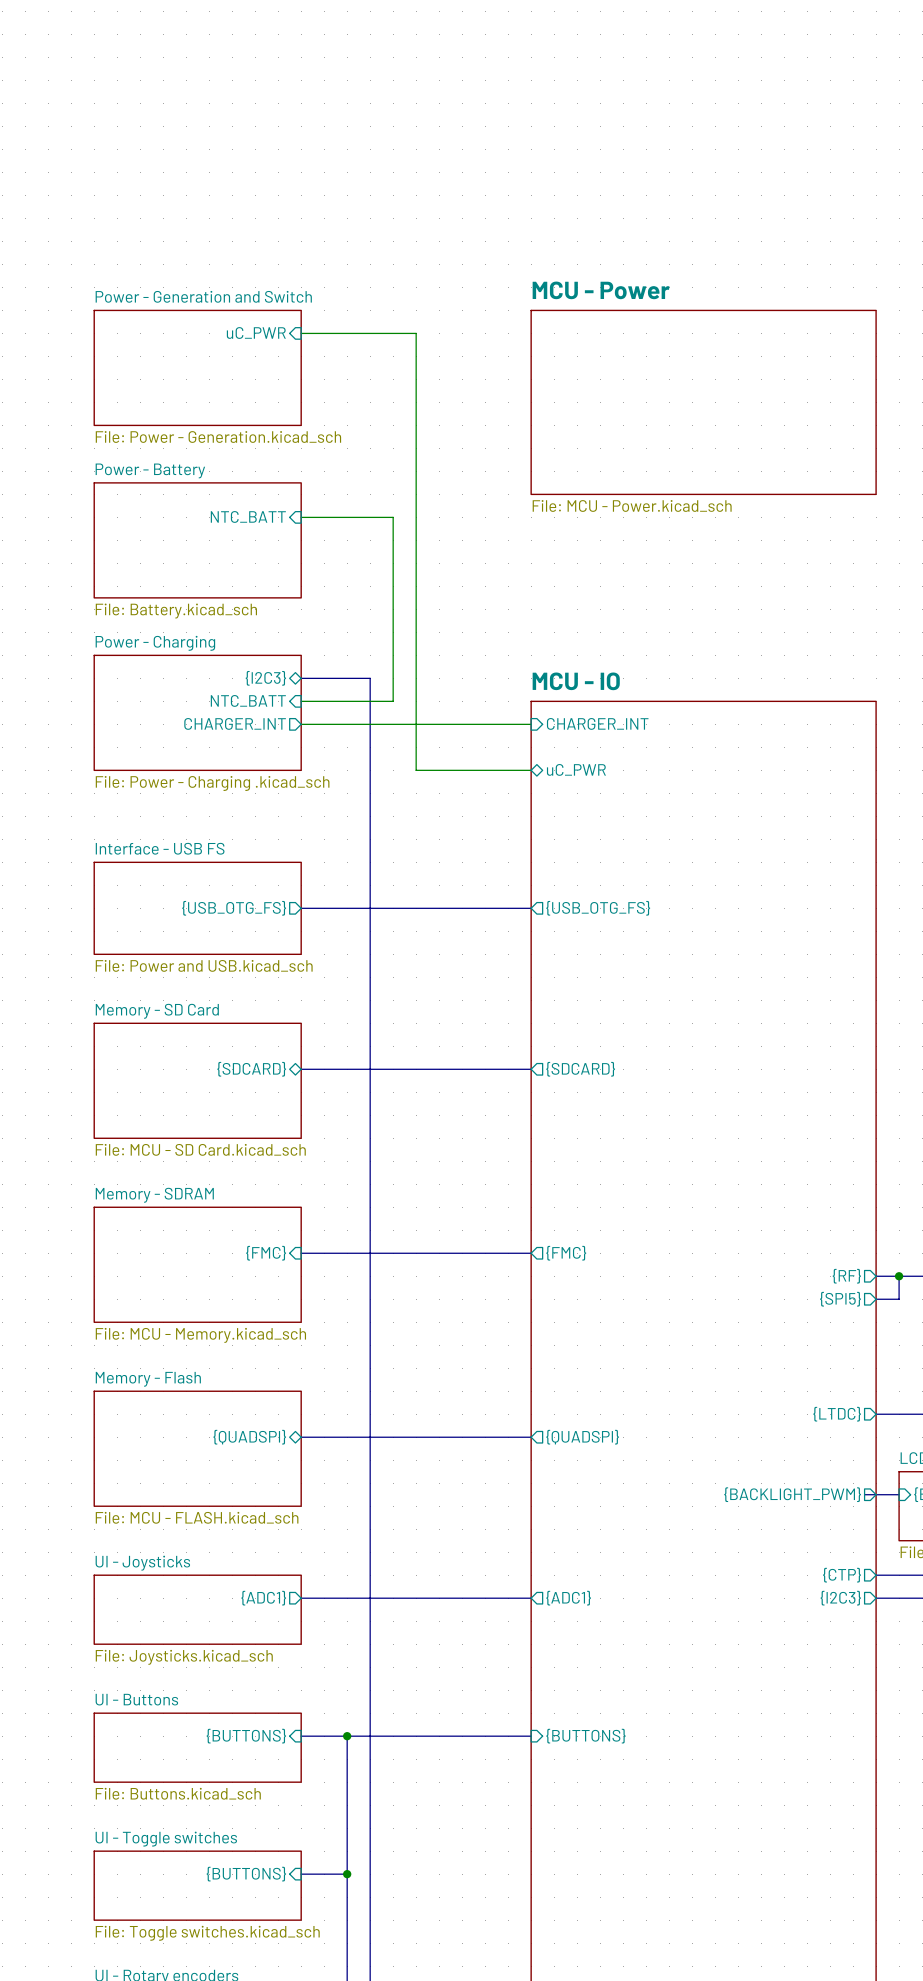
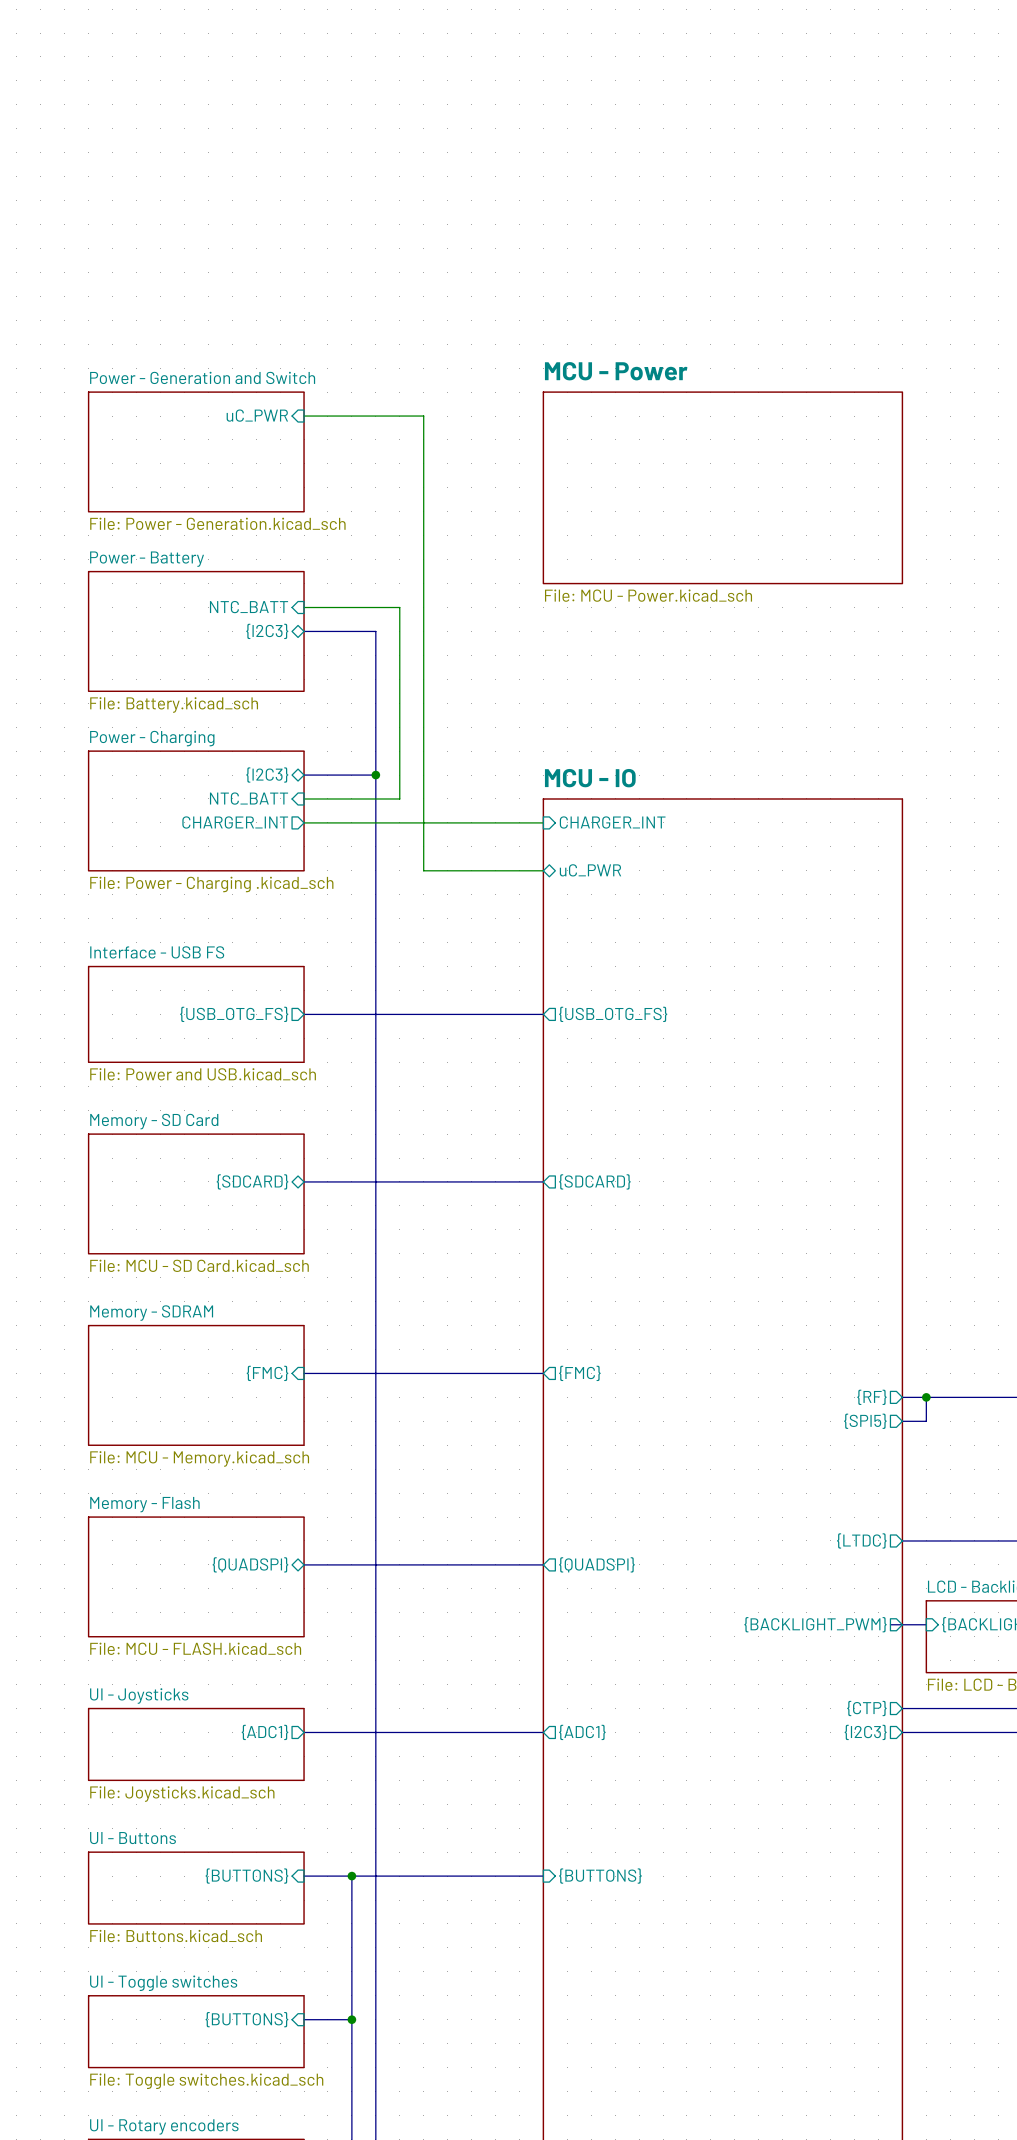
sheet pin: none -> {I2C3} (267, 631)
bus: none -> (304, 631) (375, 631) (375, 775)
junction: none -> (375, 775)

